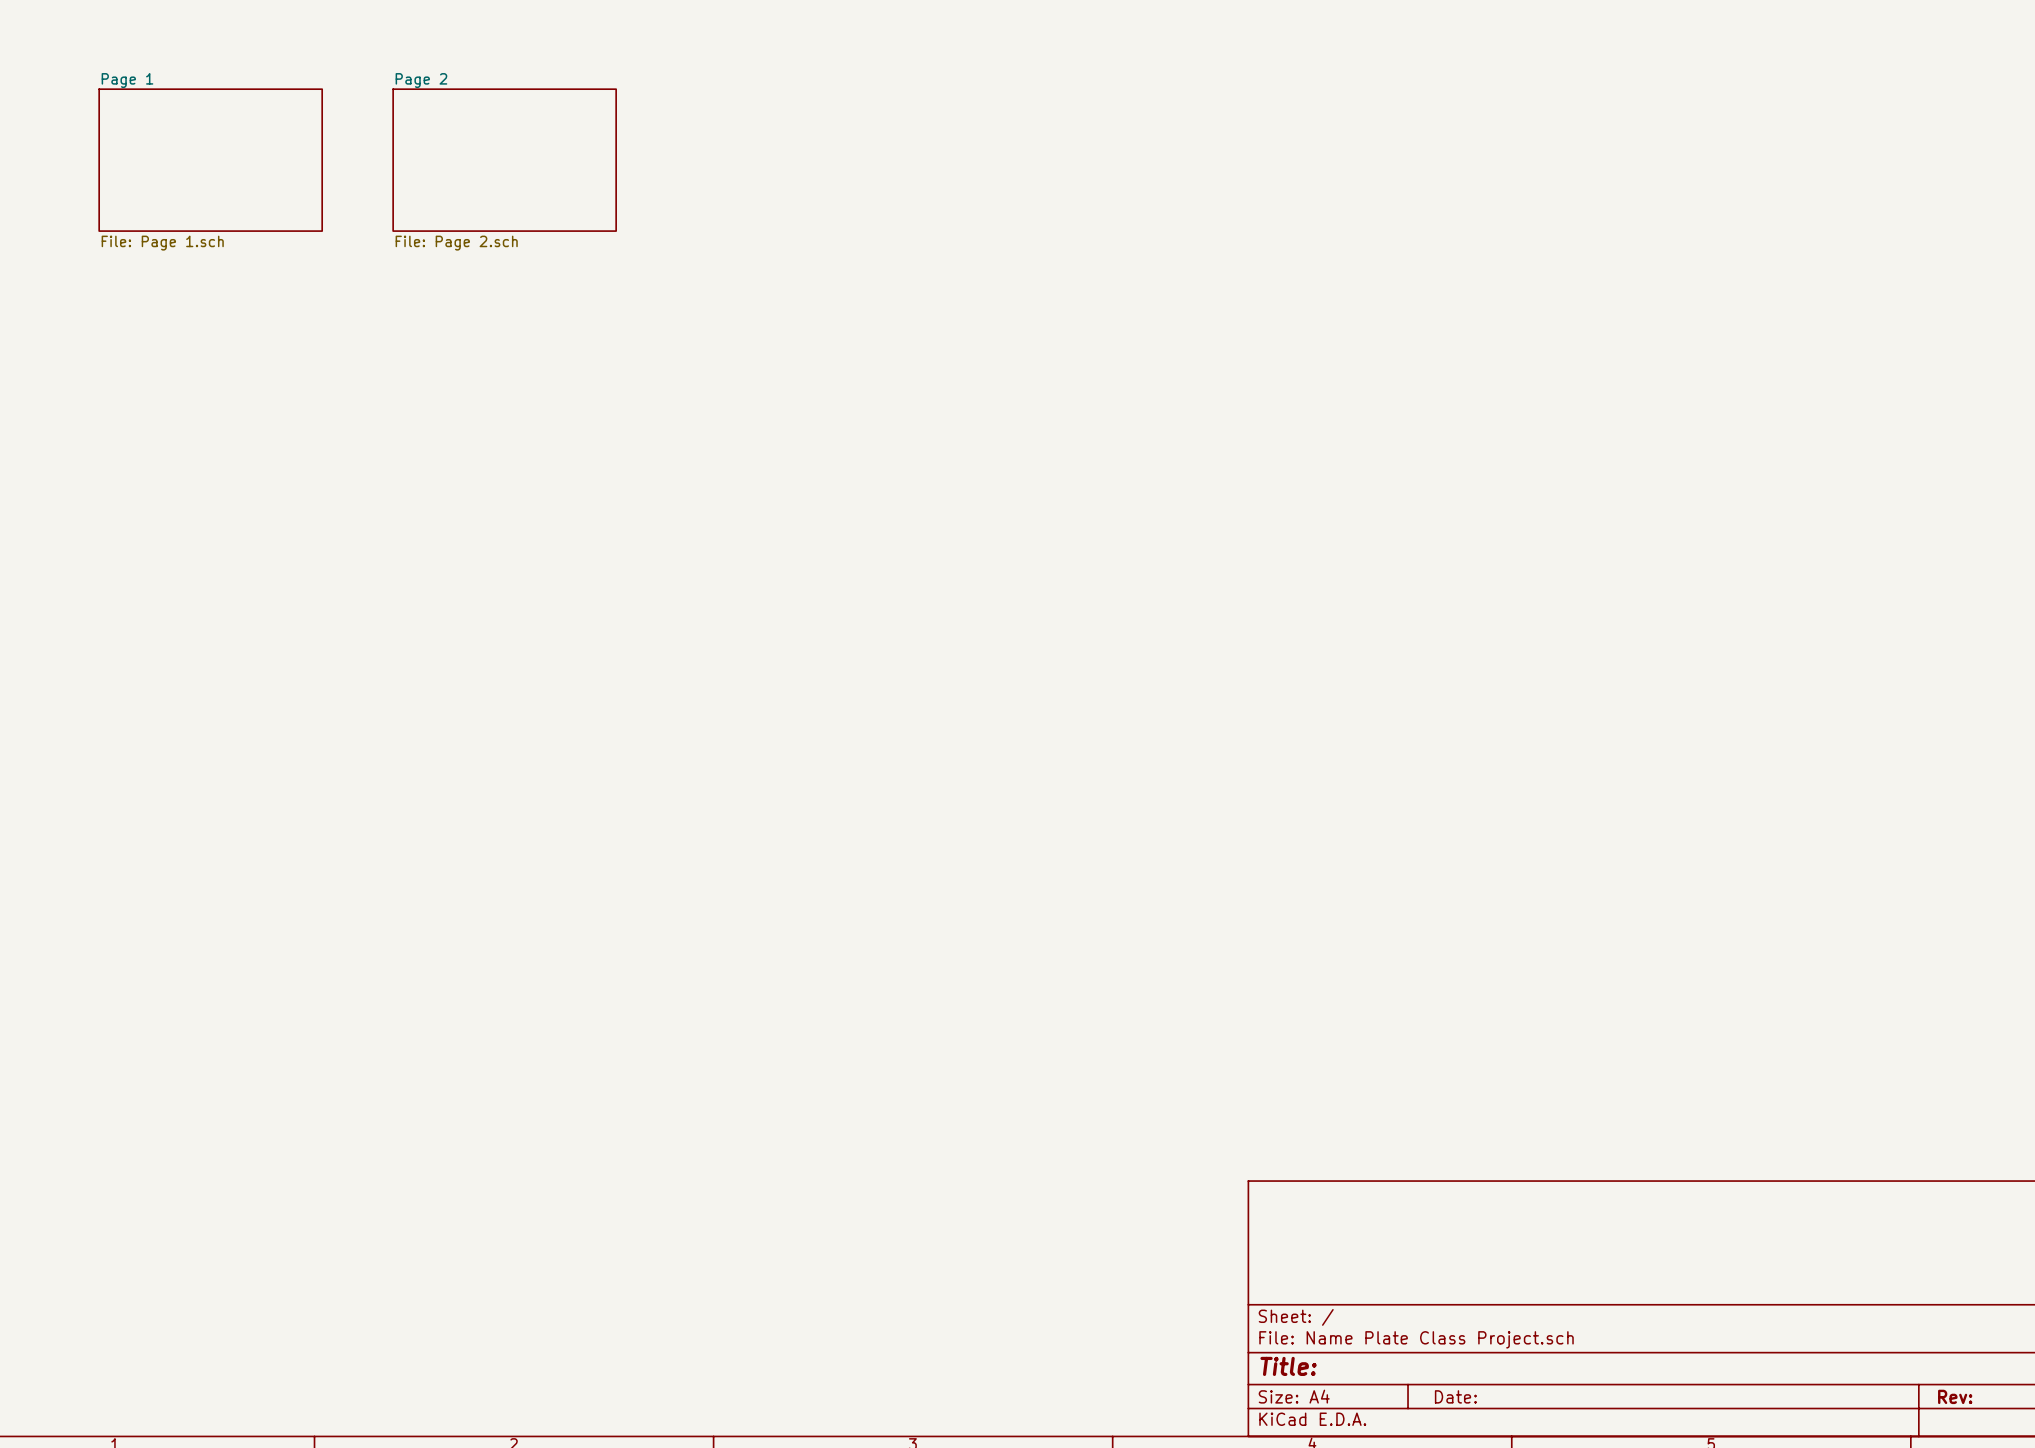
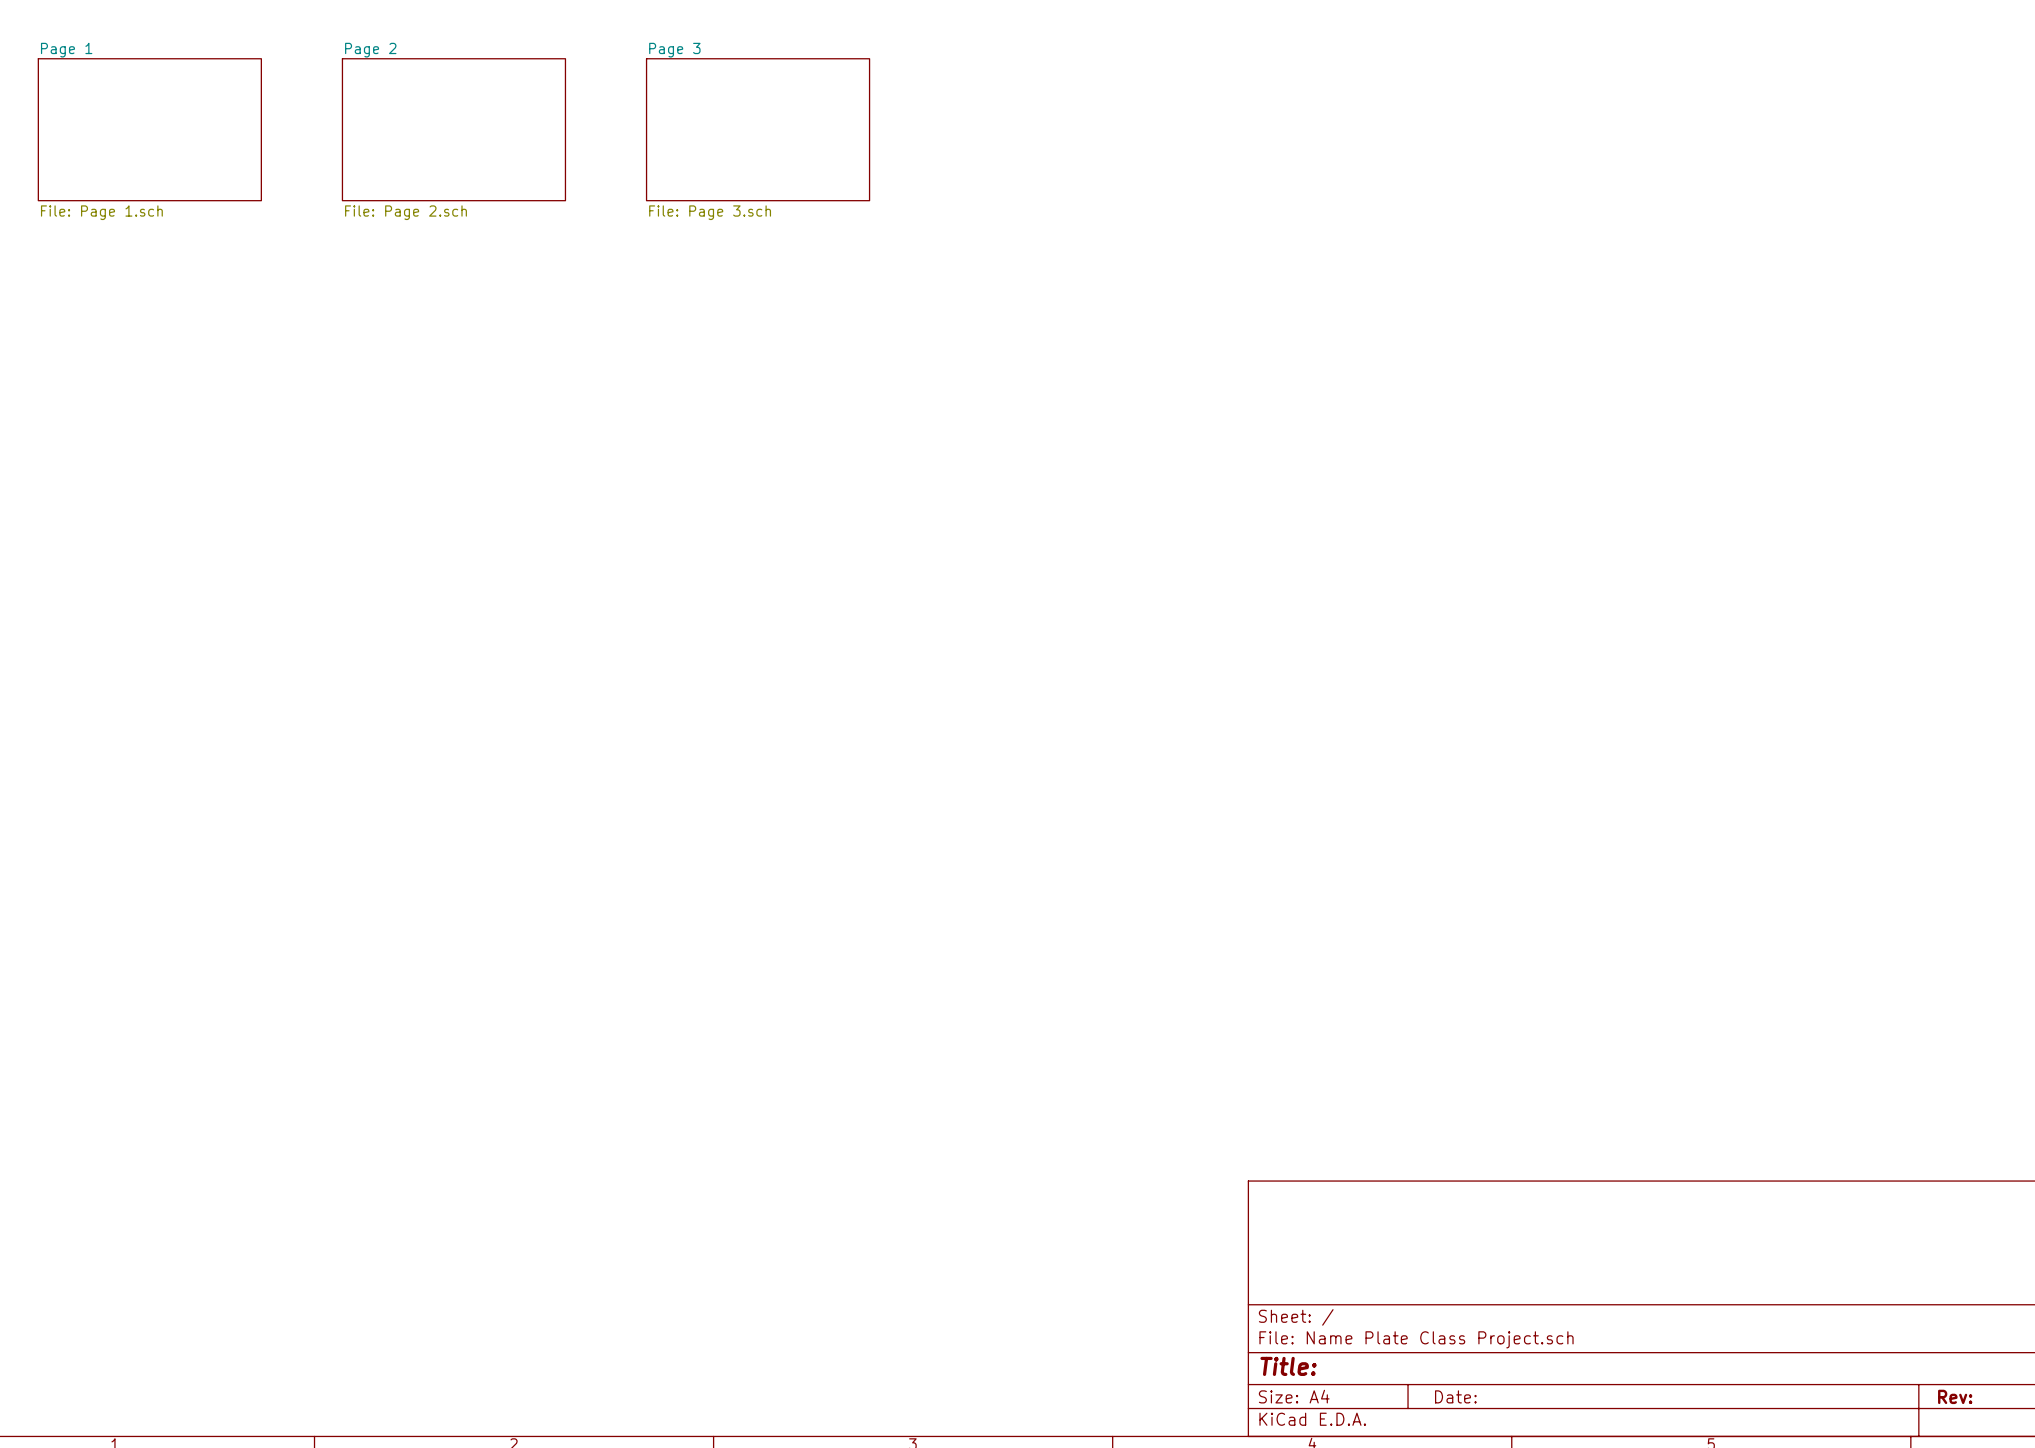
sheet Page 3: none -> File: Page 3.sch (758, 129)
sheet Page 1 position: (210, 160) -> (149, 129)
sheet Page 2 position: (504, 160) -> (453, 129)

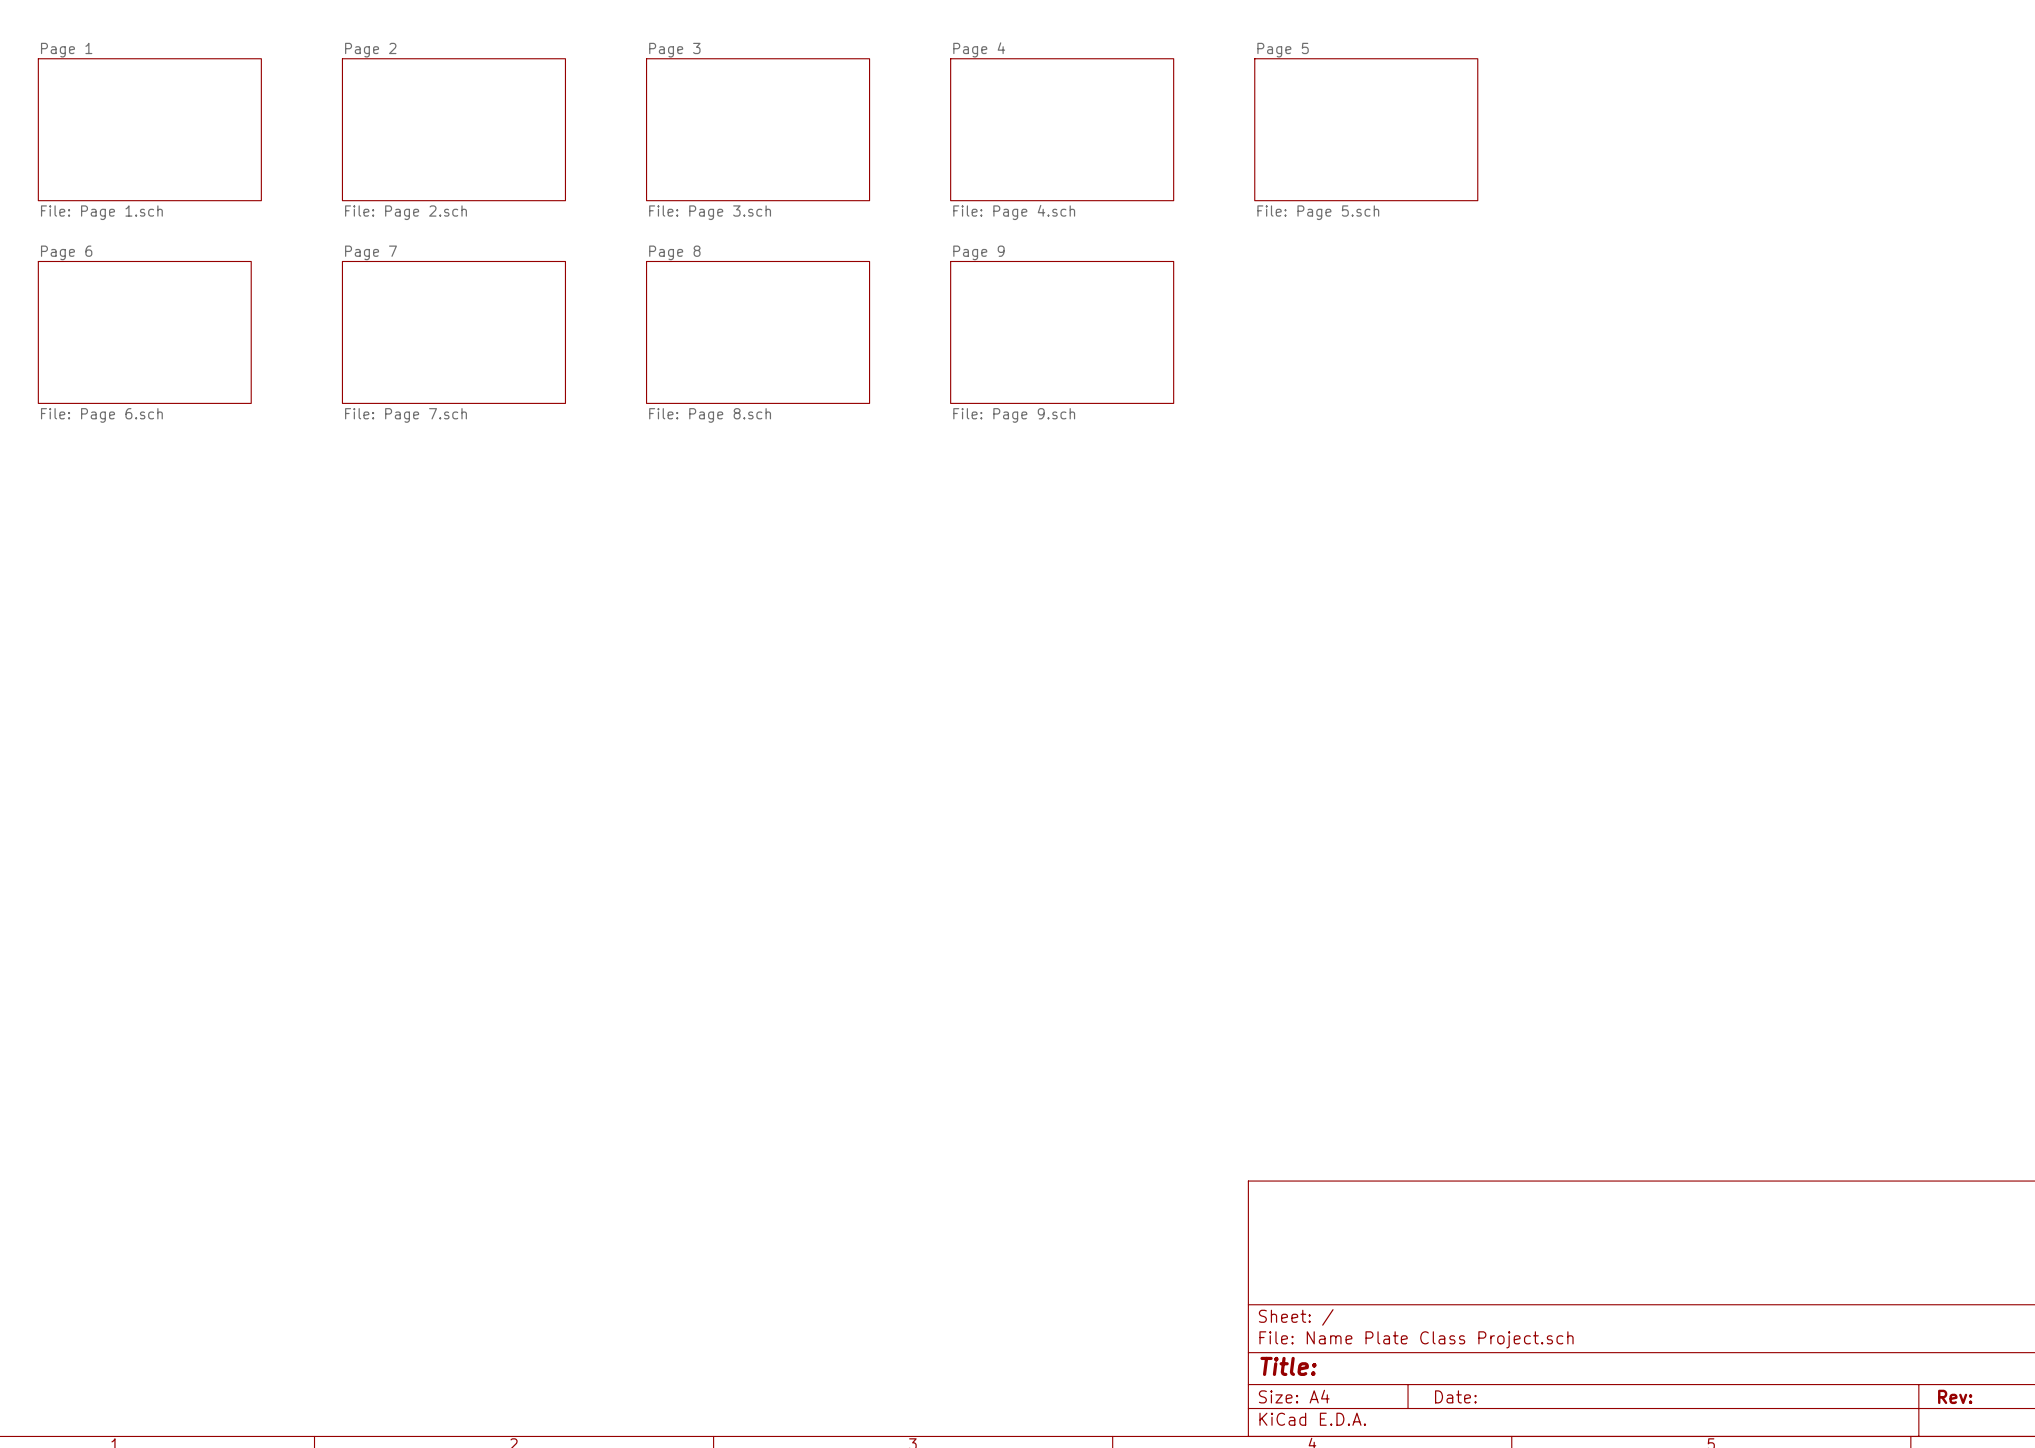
sheet Page 4: none -> File: Page 4.sch (1062, 129)
sheet Page 5: none -> File: Page 5.sch (1366, 129)
sheet Page 6: none -> File: Page 6.sch (144, 332)
sheet Page 7: none -> File: Page 7.sch (453, 332)
sheet Page 8: none -> File: Page 8.sch (758, 332)
sheet Page 9: none -> File: Page 9.sch (1062, 332)

